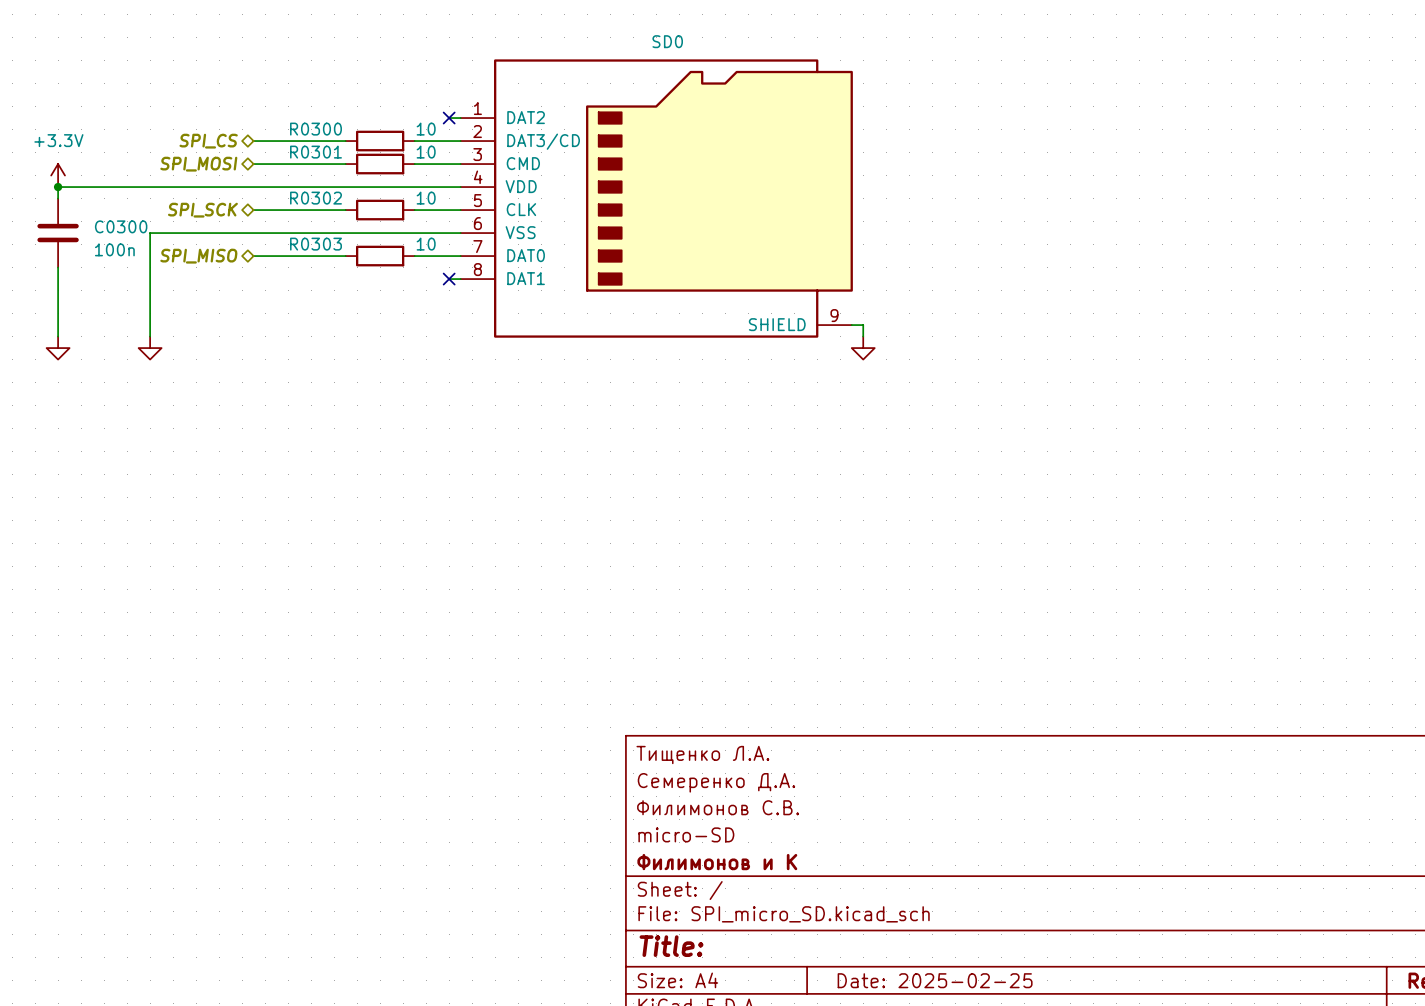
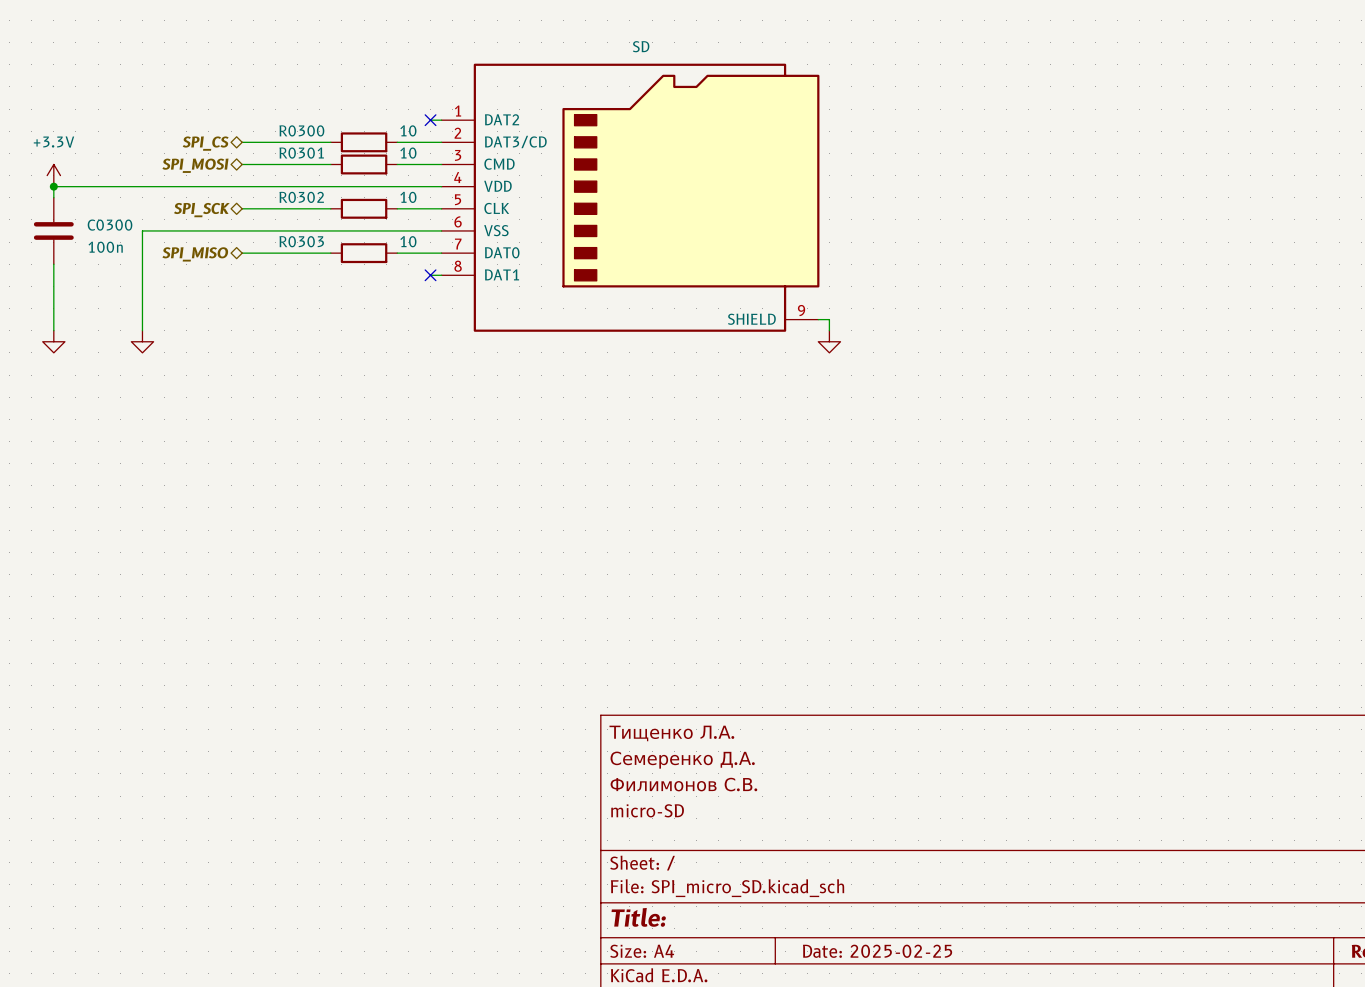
SD0 name: SD0 (667, 41) -> SD (641, 46)
title block: Филимонов и К (717, 862) -> none

